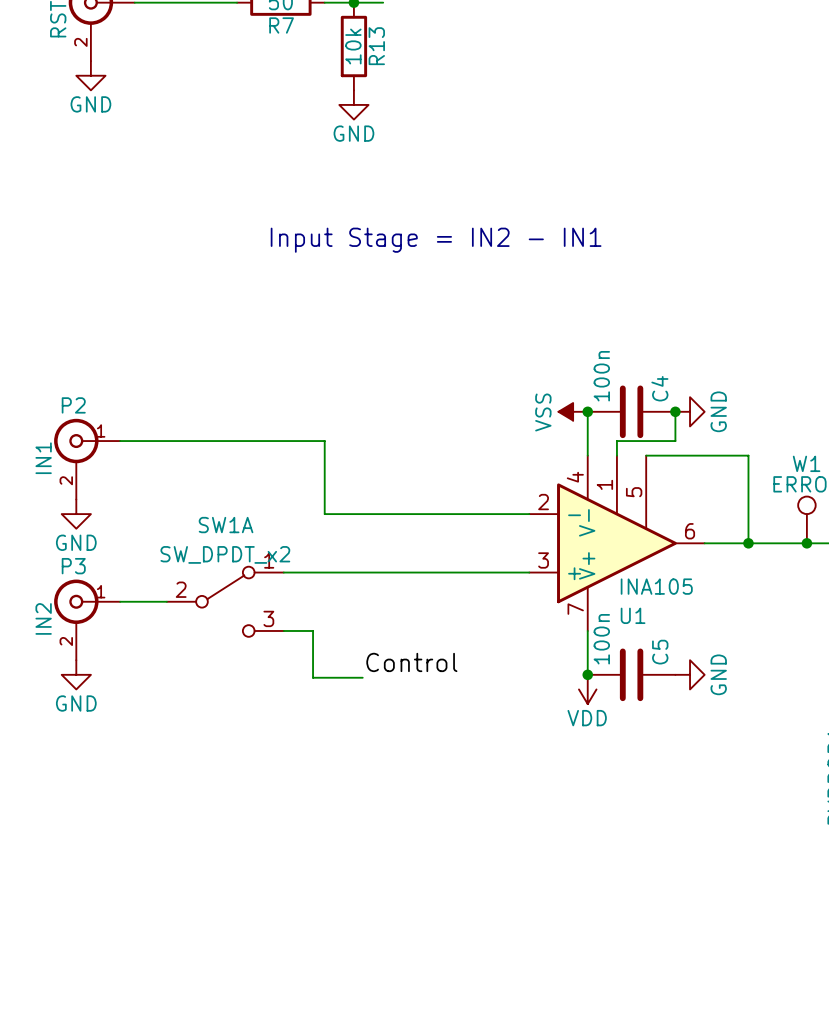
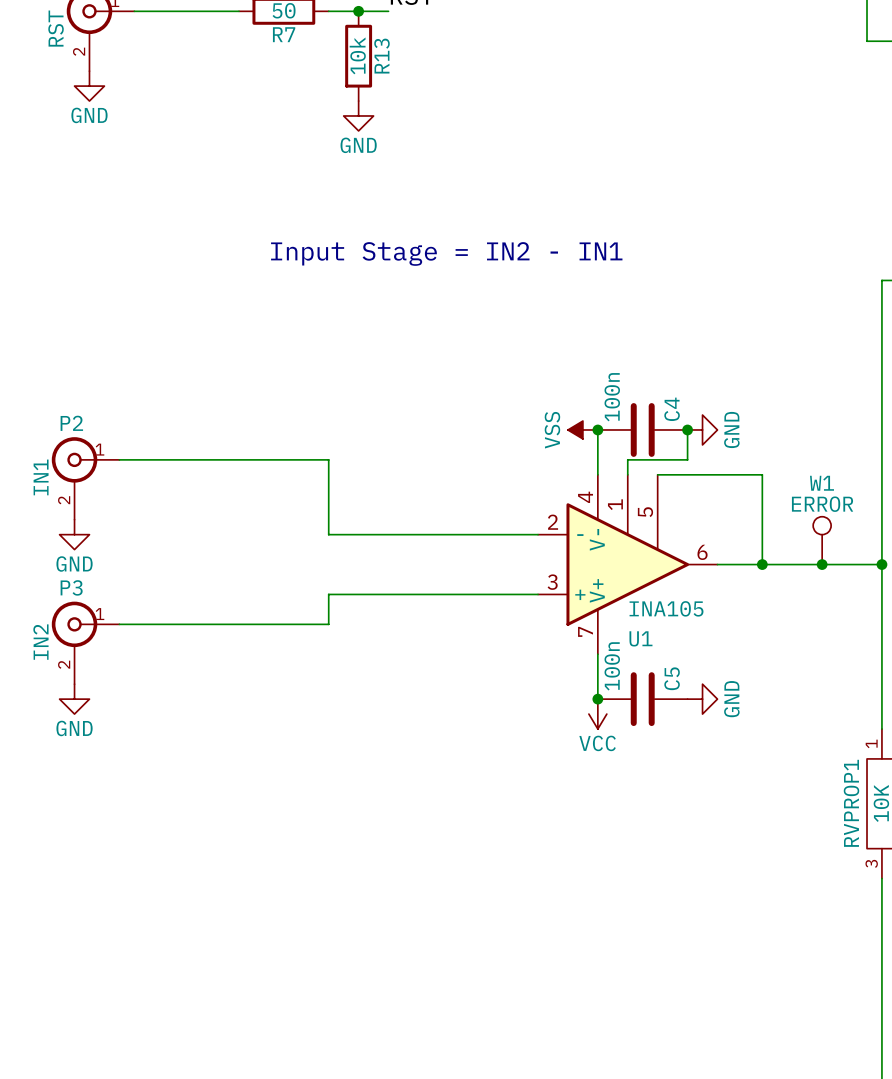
wire: (283, 572) (324, 572) -> (167, 624) (328, 624) (328, 594)
SW1A: SW_DPDT_x2 (225, 601) -> none
wire: (283, 630) (313, 630) (313, 677) (362, 677) -> none
label: Control (411, 662) -> none
power symbol: VDD (587, 689) -> VCC (597, 714)

